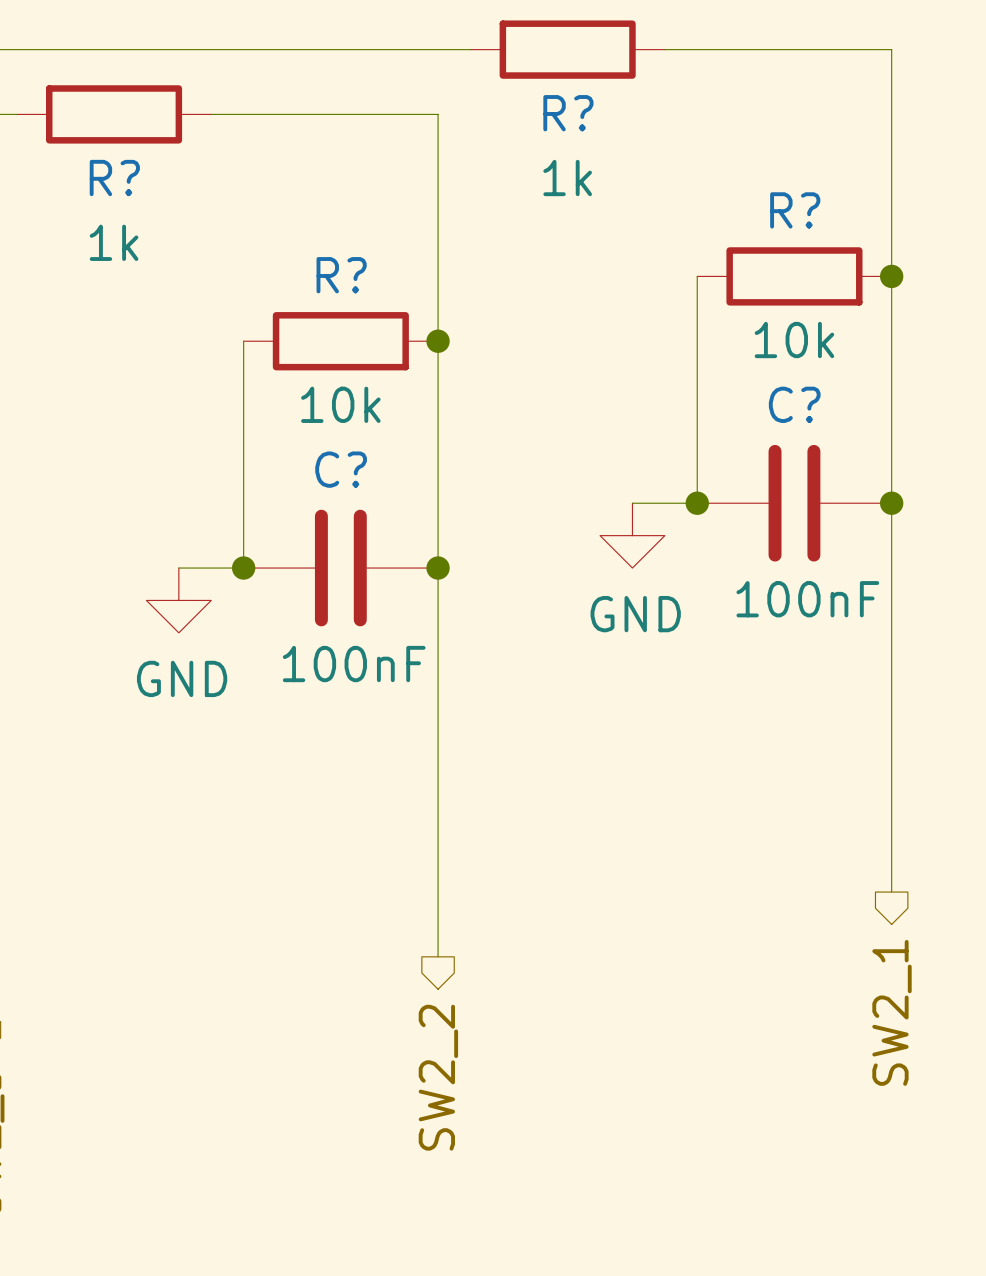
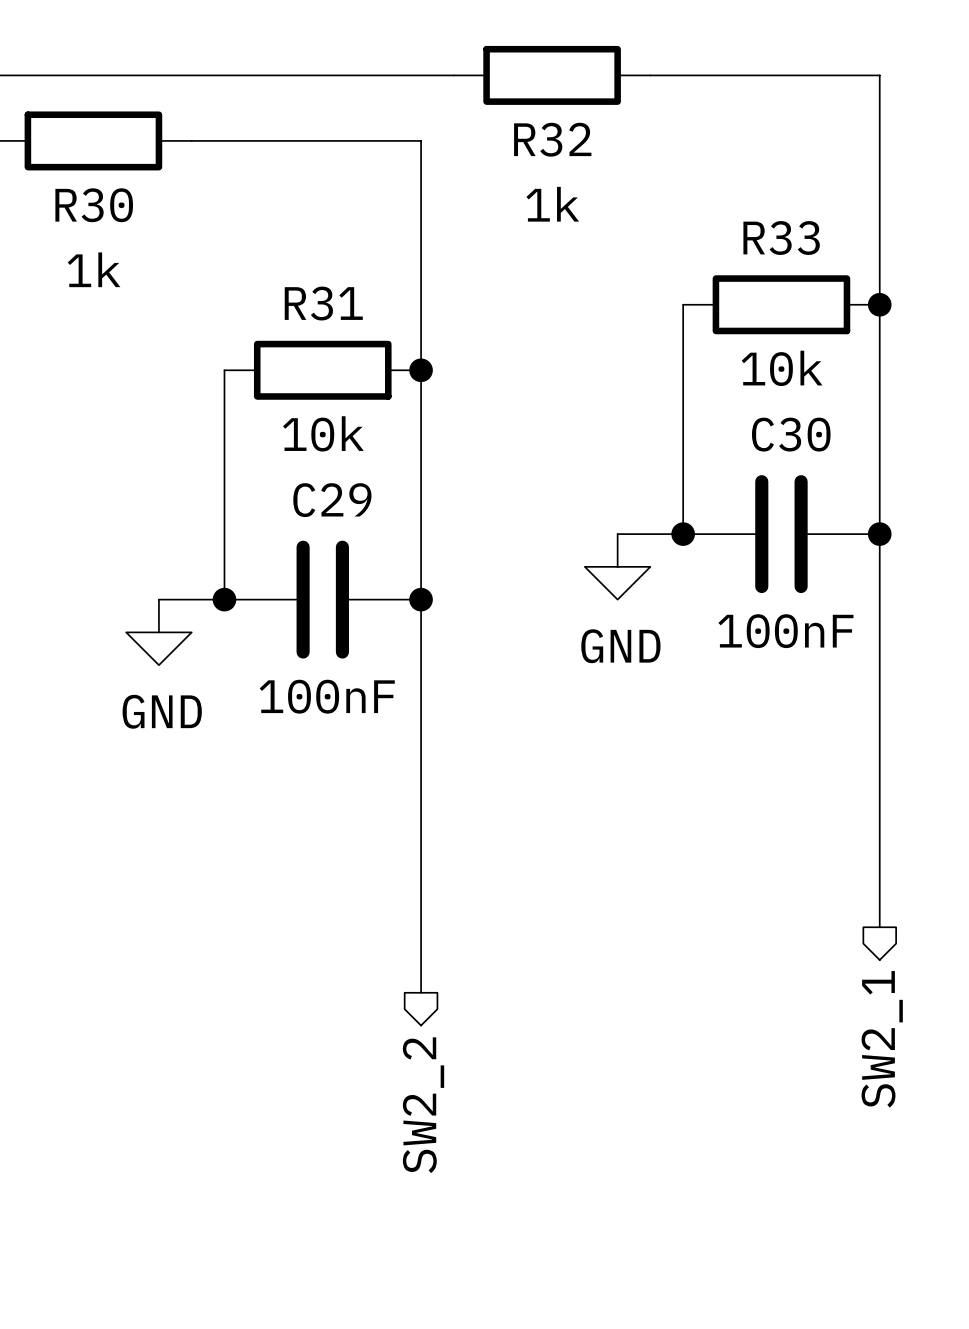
R? name: R? (568, 113) -> R32 (552, 139)
R? name: R? (114, 178) -> R30 (94, 205)
R? name: R? (795, 210) -> R33 (781, 238)
R? name: R? (341, 275) -> R31 (323, 303)
C? name: C? (794, 404) -> C30 (791, 434)
C? name: C? (341, 469) -> C29 (332, 500)

